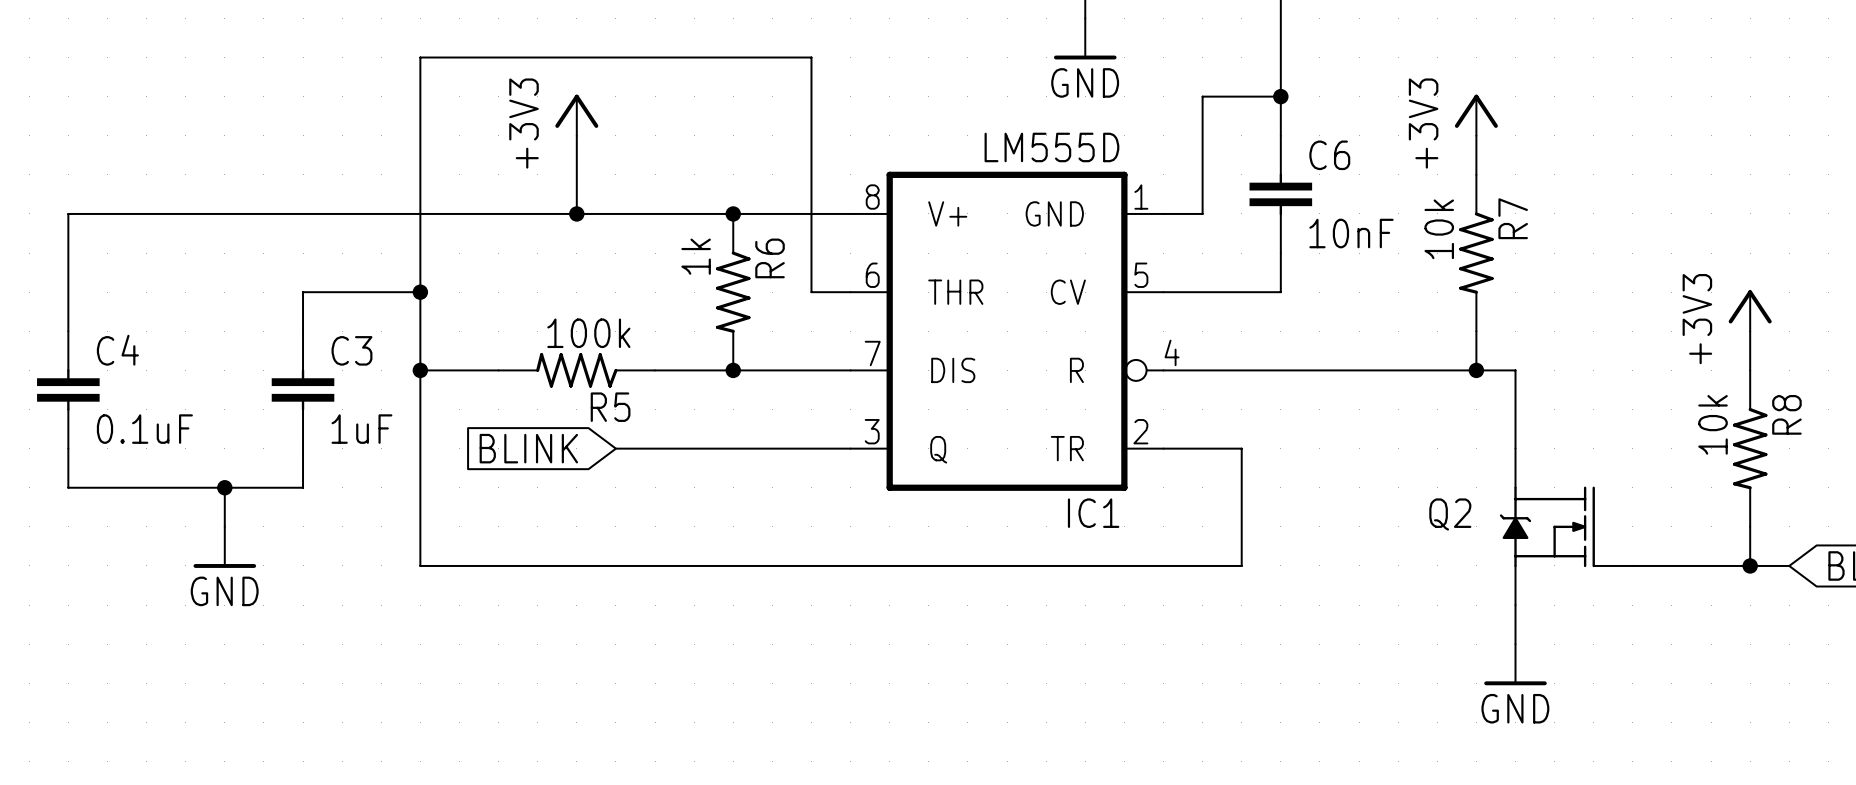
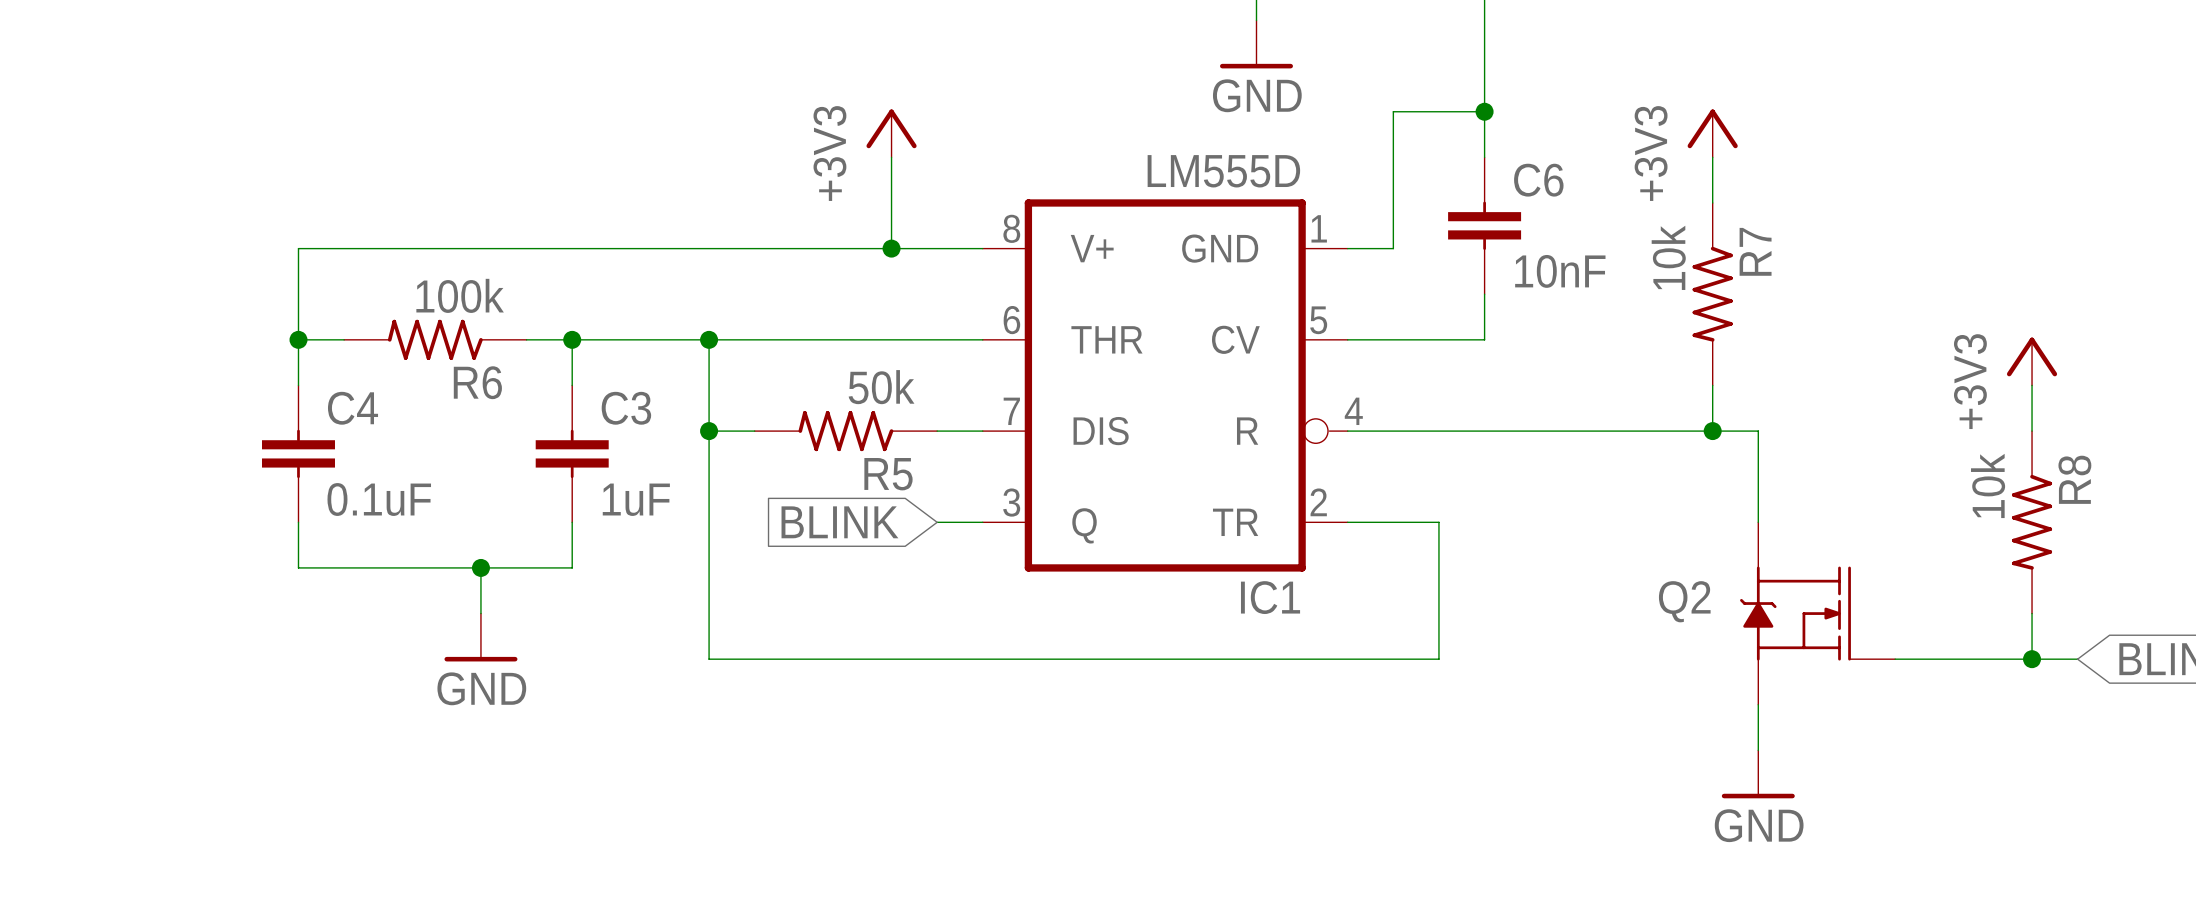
power symbol position: +3V3 (576, 115) -> +3V3 (891, 133)
wire: (576, 135) (576, 213) -> (891, 157) (891, 248)
wire: (263, 213) (68, 213) (68, 331) -> (298, 248) (298, 385)
junction: (576, 213) -> none
junction position: (733, 213) -> (891, 248)
R6 value: 1k (696, 256) -> 100k (460, 295)
wire: none -> (298, 339) (344, 339)
junction: none -> (298, 339)
wire: (420, 292) (303, 292) (303, 331) -> none
junction: (420, 292) -> none
junction: none -> (572, 339)
junction: none -> (709, 339)
R6 rotation: 0° (733, 292) -> 90° clockwise (435, 339)
R6 position: (733, 292) -> (435, 339)
wire: (811, 292) (811, 57) (420, 57) (420, 487) -> (937, 339) (526, 339)
R5 value: 100k (588, 333) -> 50k (881, 387)
wire: (420, 370) (498, 370) -> none
junction: (420, 370) -> none
R5 position: (576, 370) -> (845, 431)
junction: none -> (709, 431)
junction: (733, 370) -> none
C4 position: (68, 389) -> (298, 453)
C3 position: (303, 389) -> (572, 453)
wire: (68, 448) (68, 487) (263, 487) -> (298, 522) (298, 567)
wire: (303, 448) (303, 487) -> (572, 522) (572, 567) (344, 567)
global label position: BLINK (528, 448) -> BLINK (839, 522)
wire: (615, 448) (811, 448) -> none
wire: (224, 487) (224, 526) -> (572, 339) (572, 385)
junction: (224, 487) -> none
junction: none -> (480, 567)
wire: (420, 526) (420, 565) (615, 565) -> (709, 339) (709, 659)
power symbol position: GND (224, 547) -> GND (480, 637)

